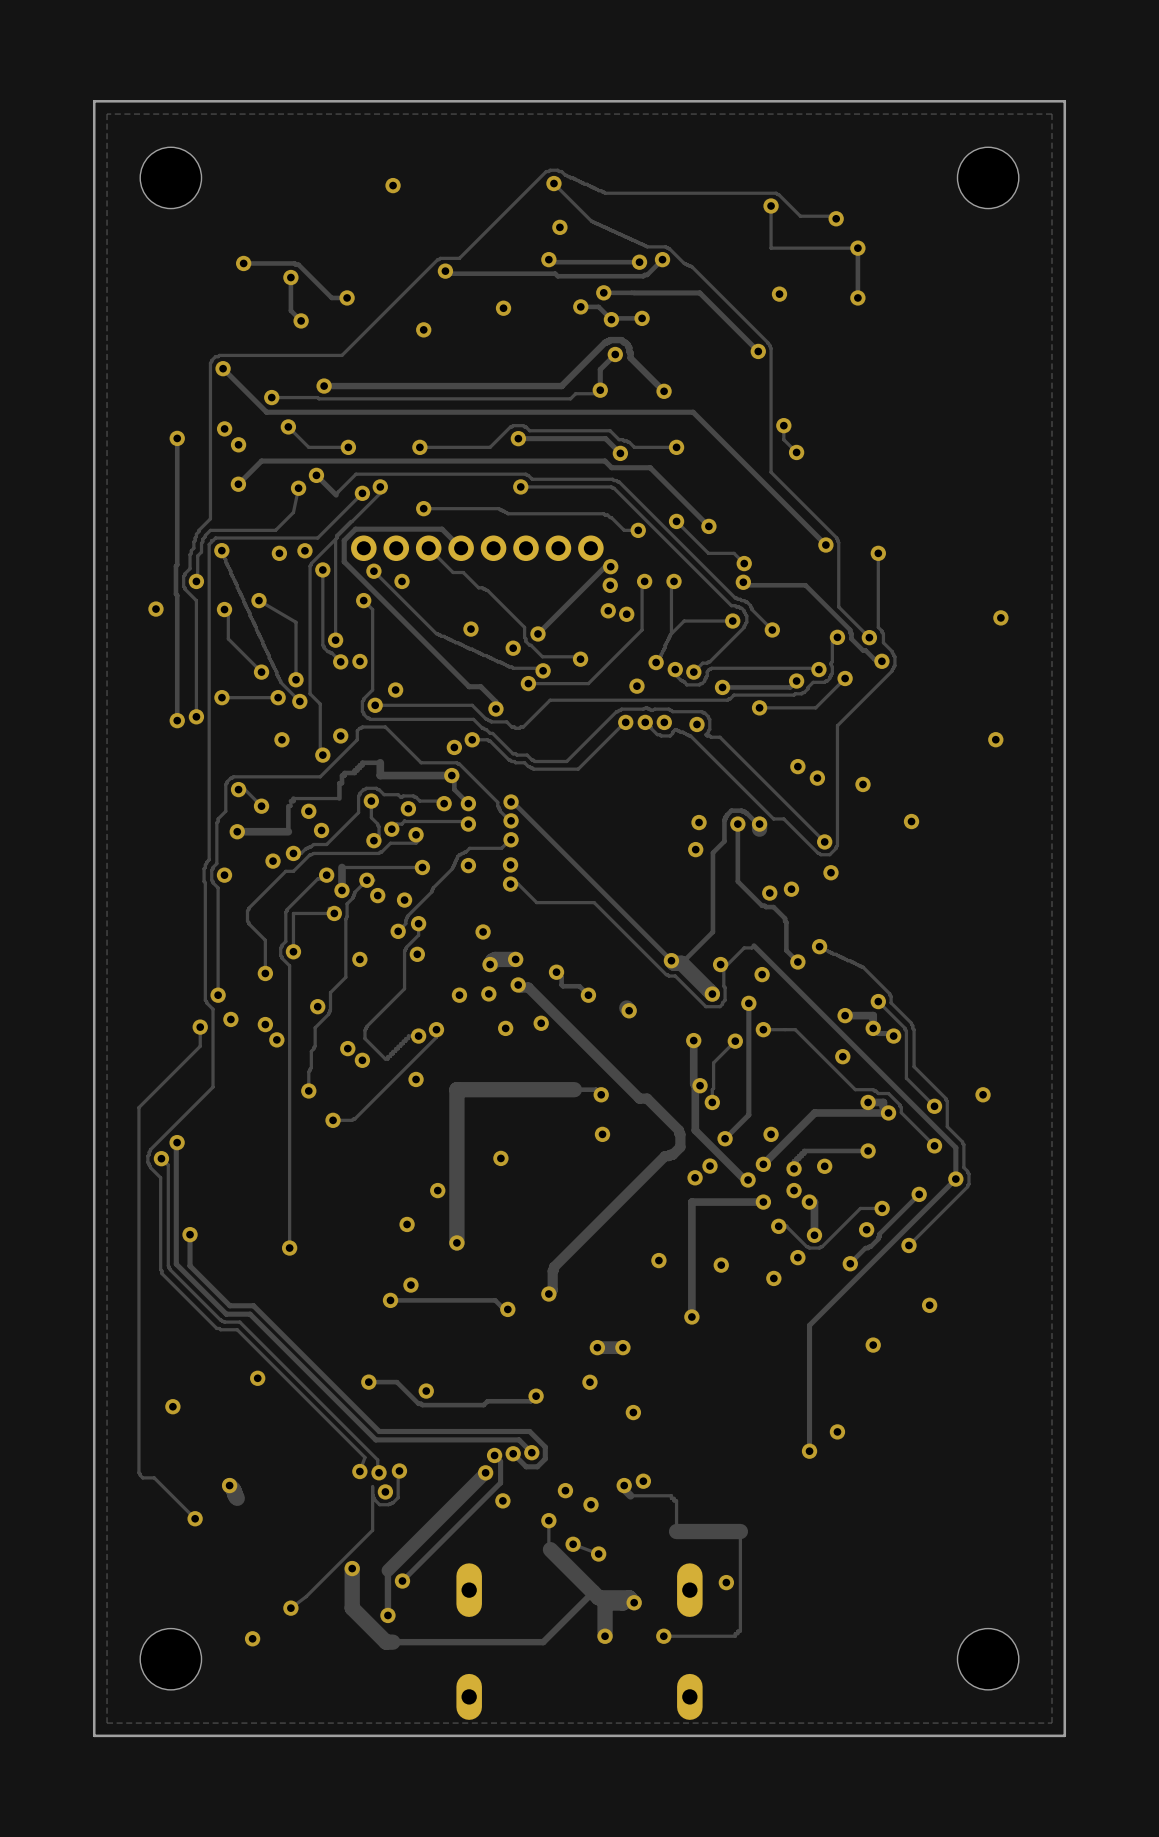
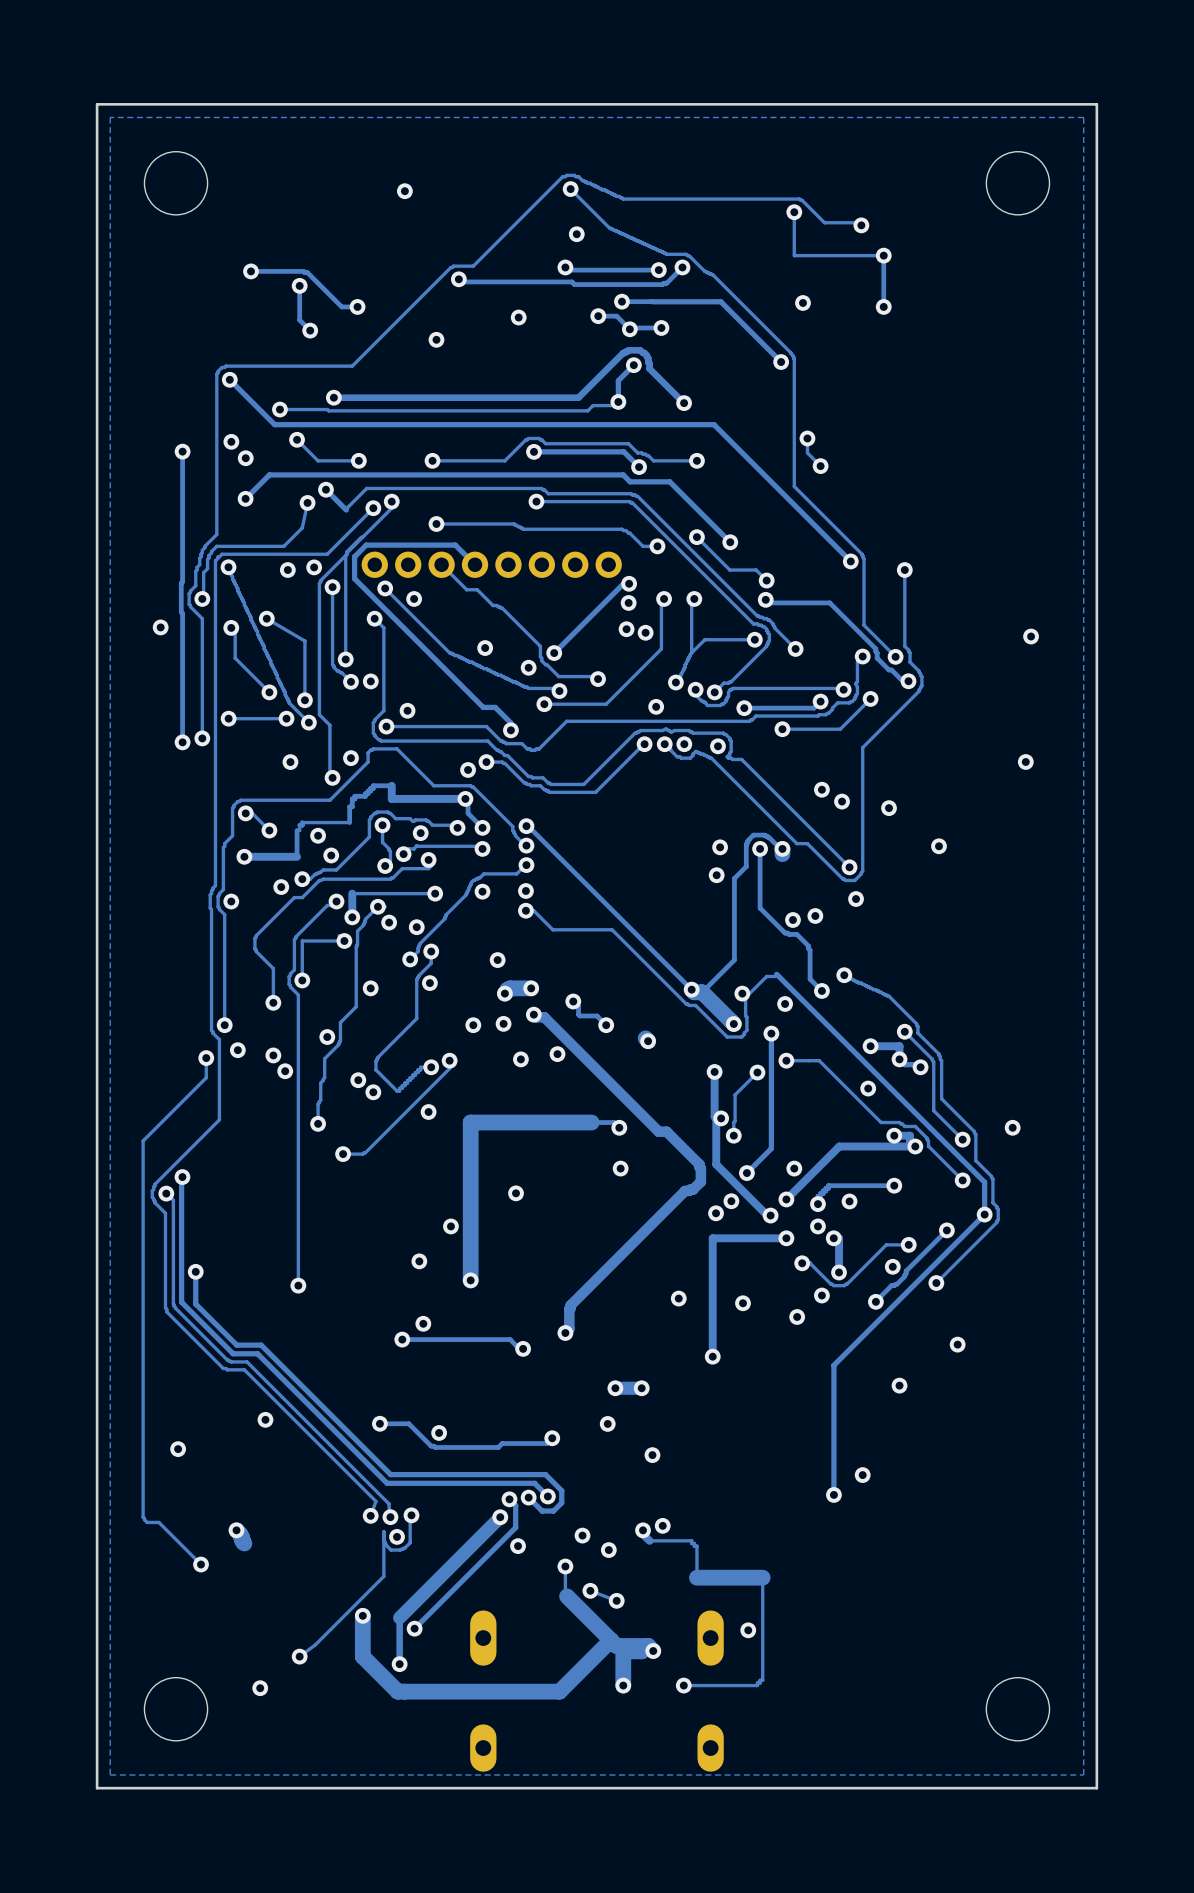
track width: thin (593, 1592) (543, 1642) (392, 1642) -> thick (610, 1640) (559, 1691) (404, 1691)

